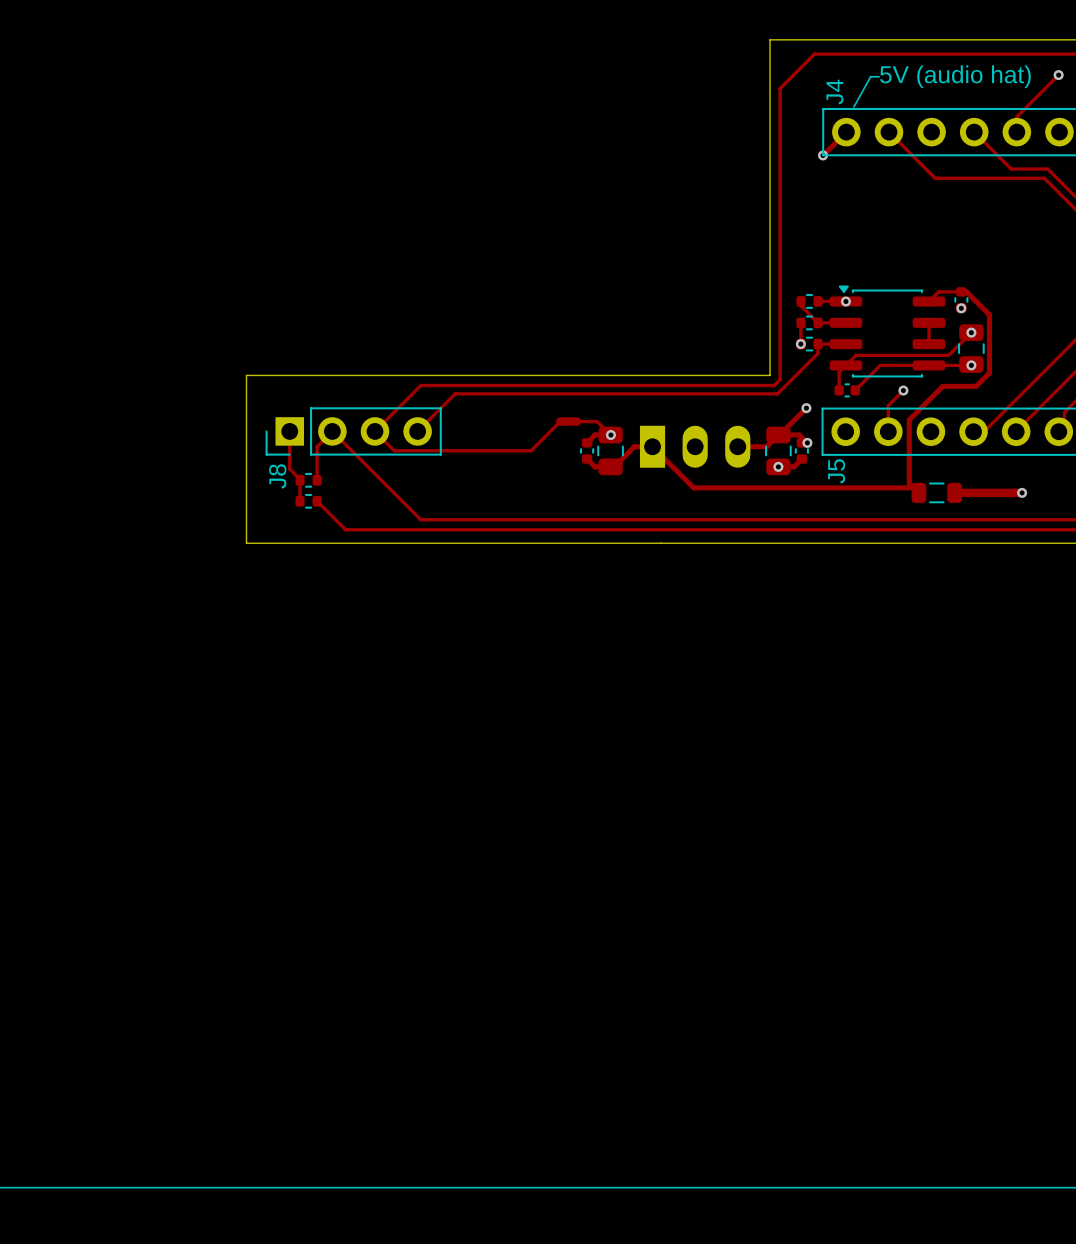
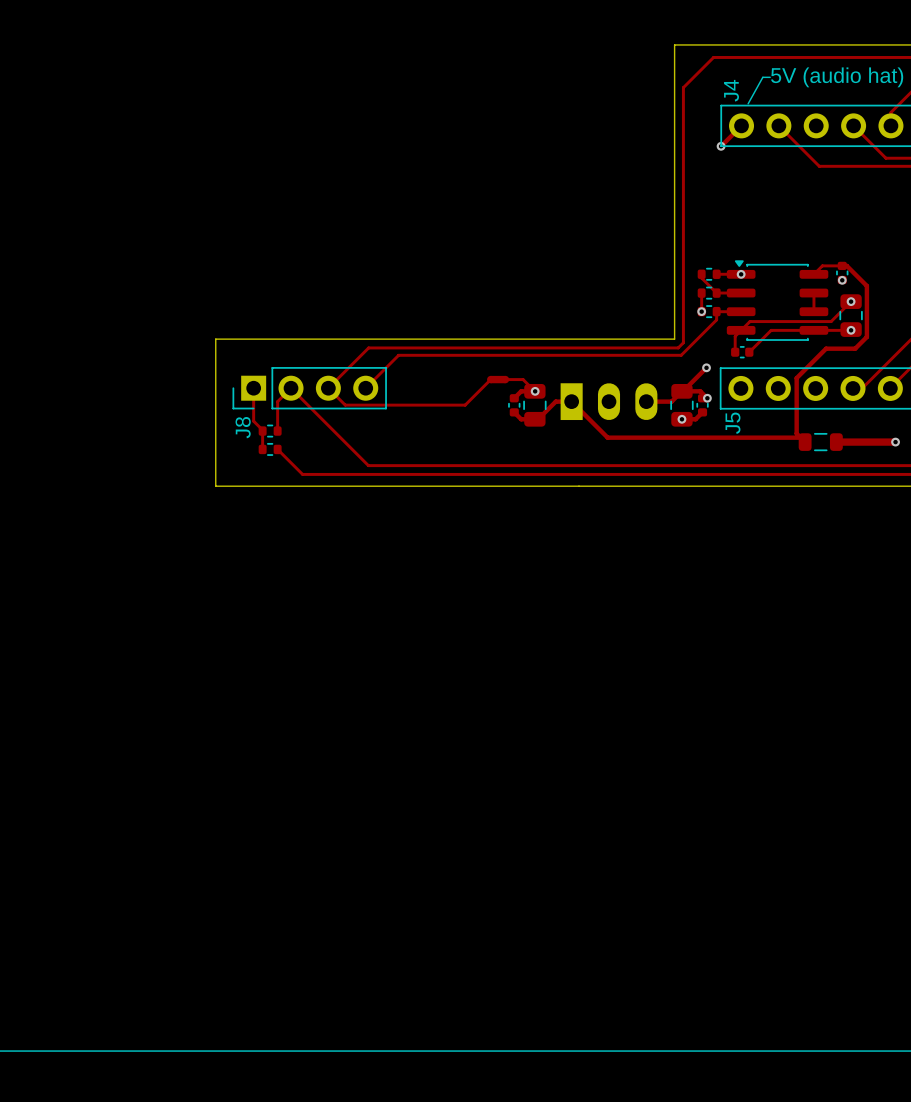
track: (903, 390) (888, 405) (888, 431) -> none
via: (903, 390) -> none

